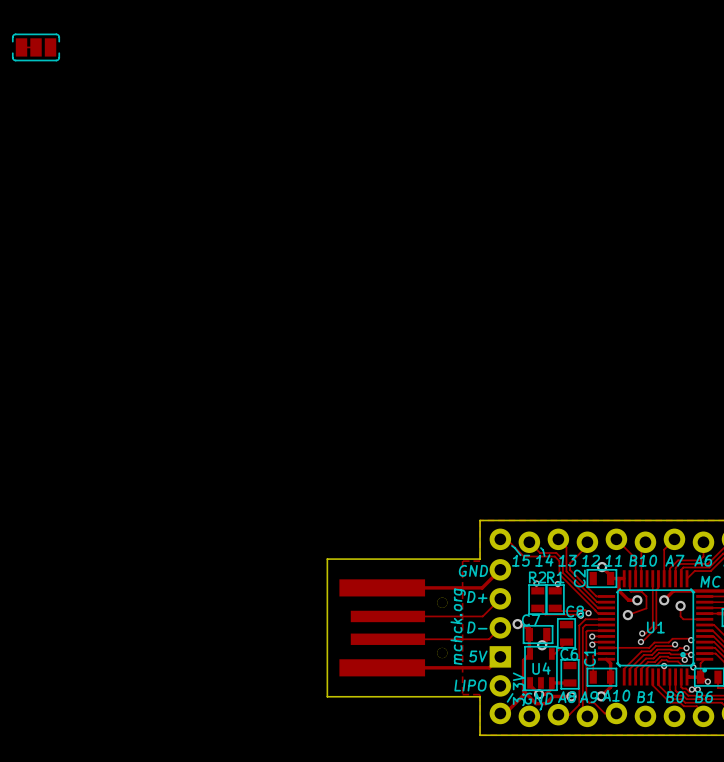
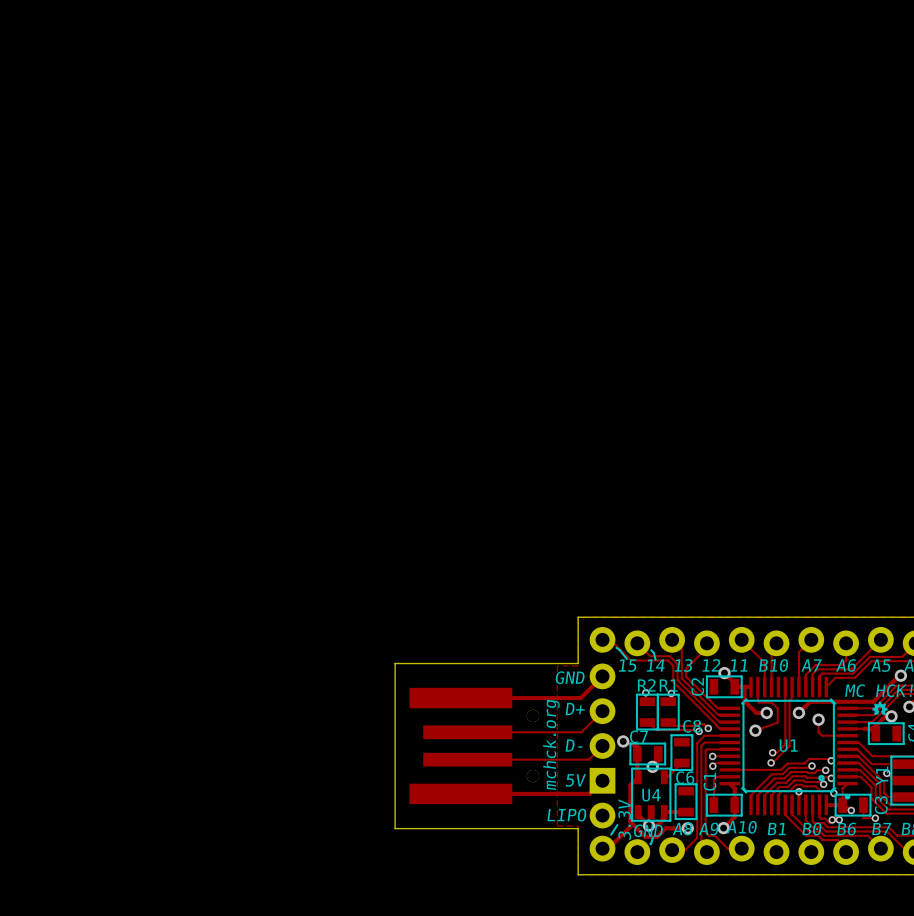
part: (36, 47) -> none

